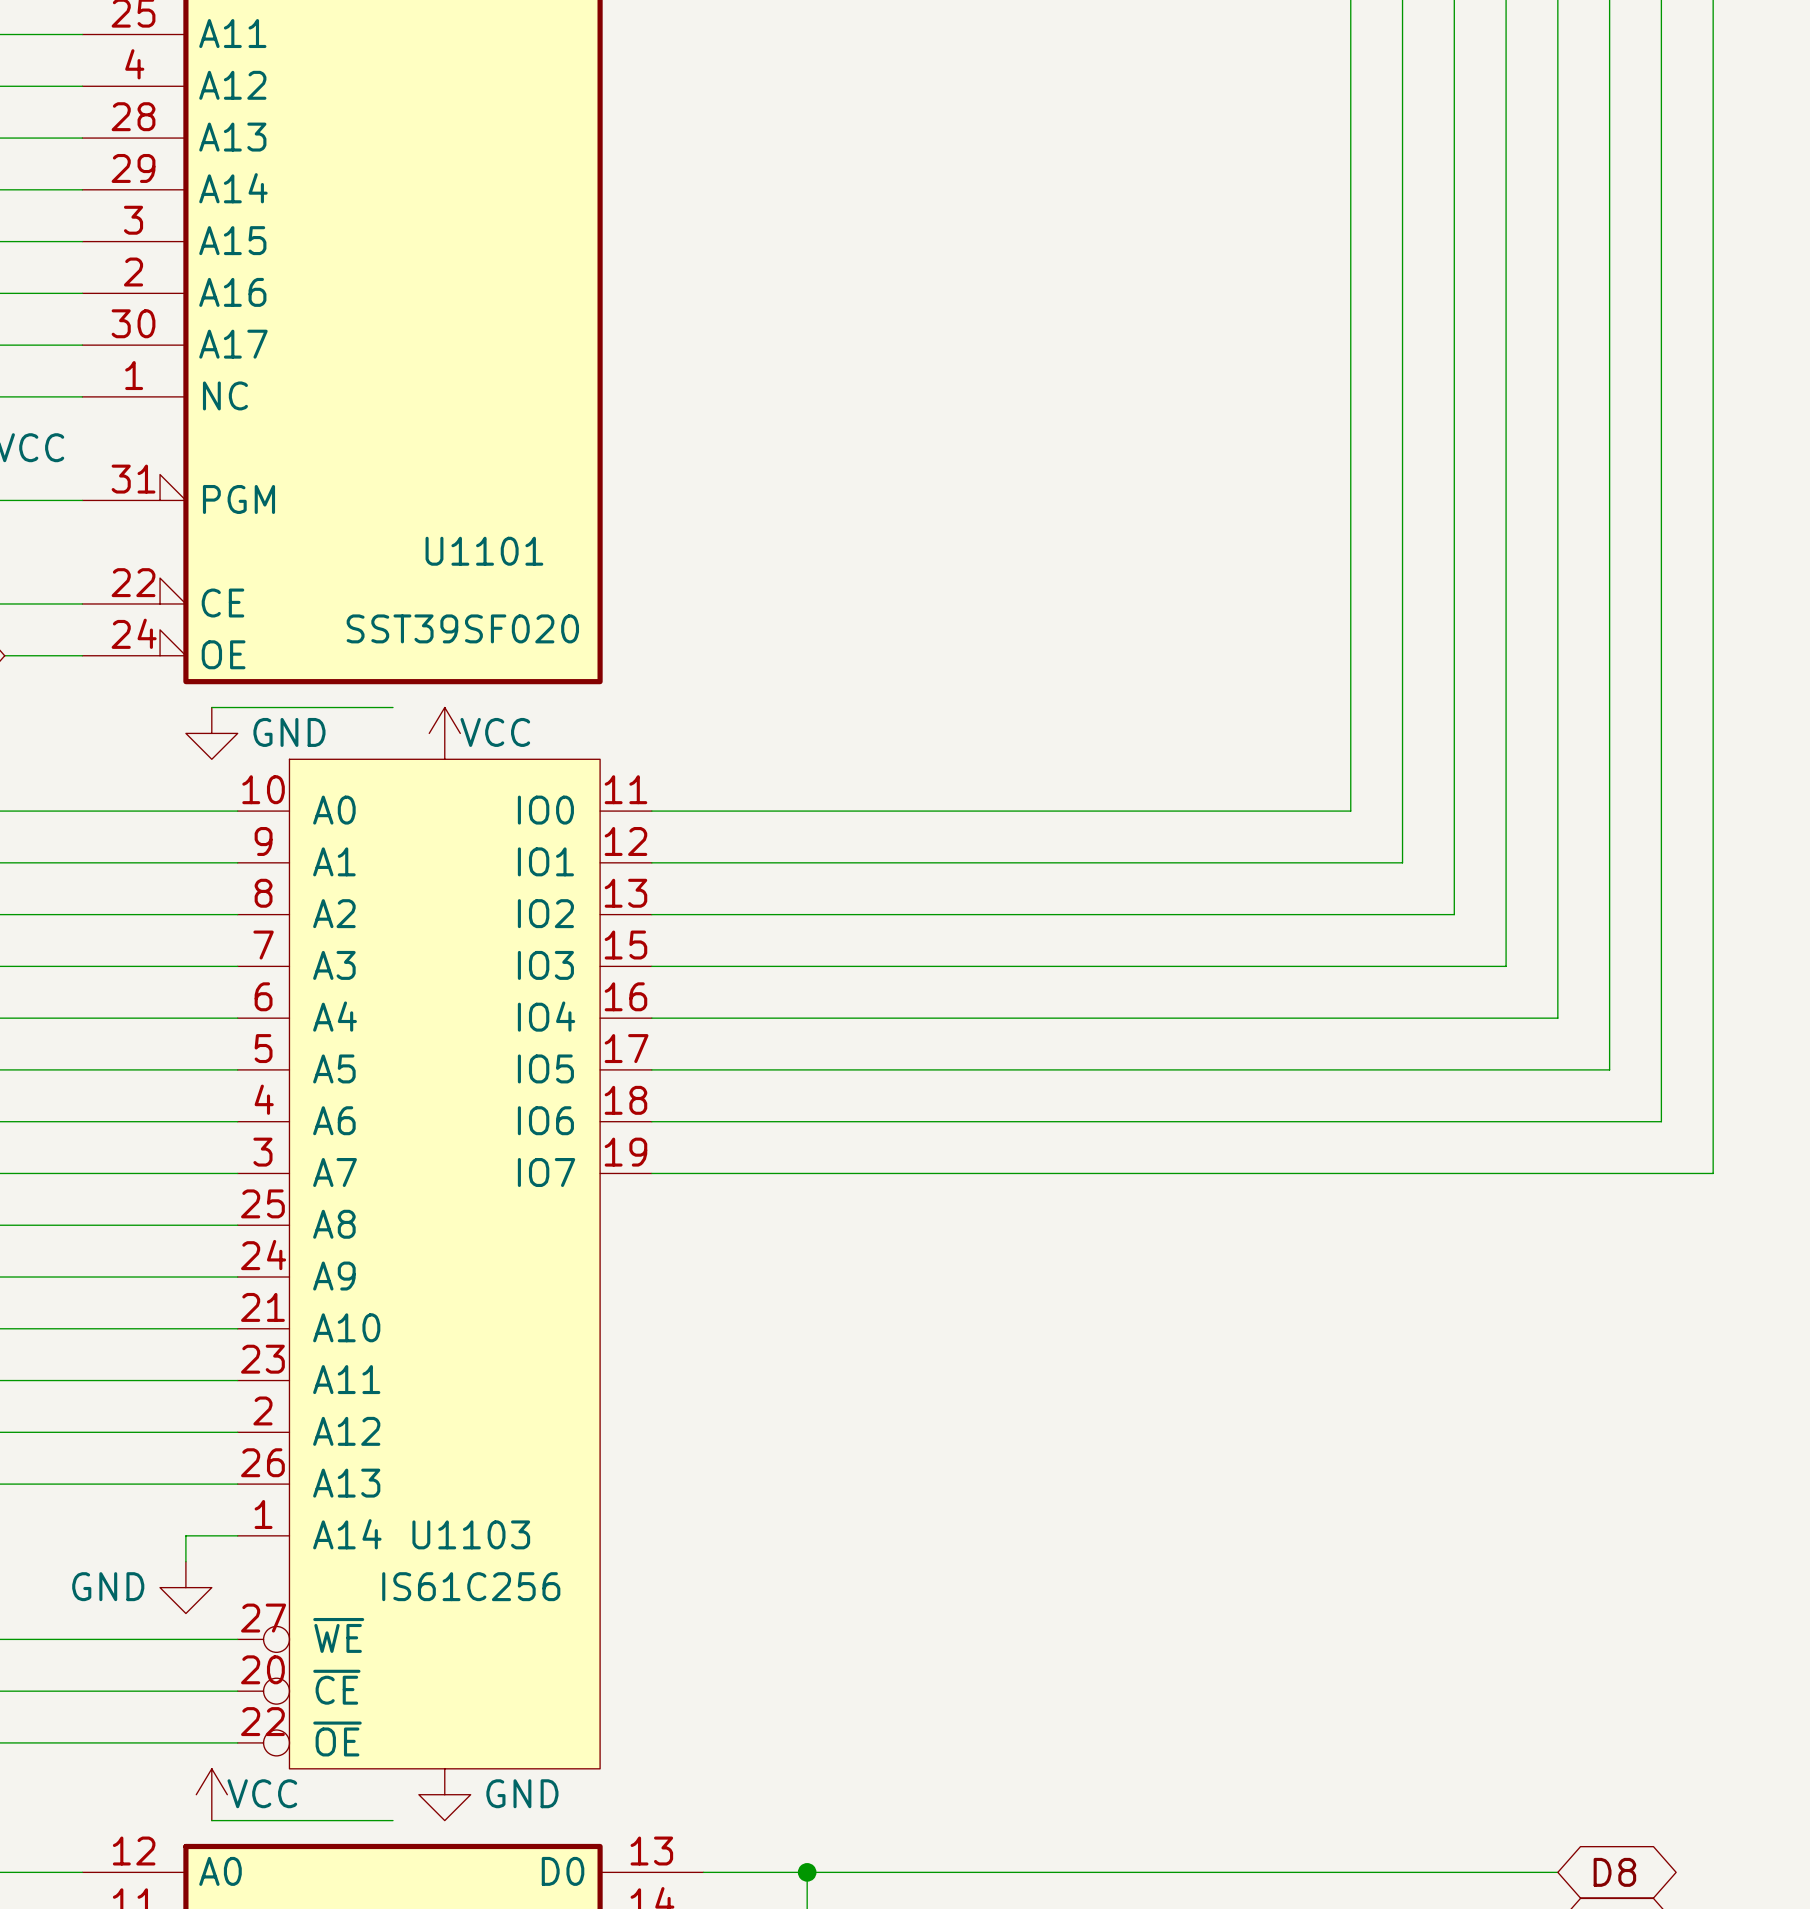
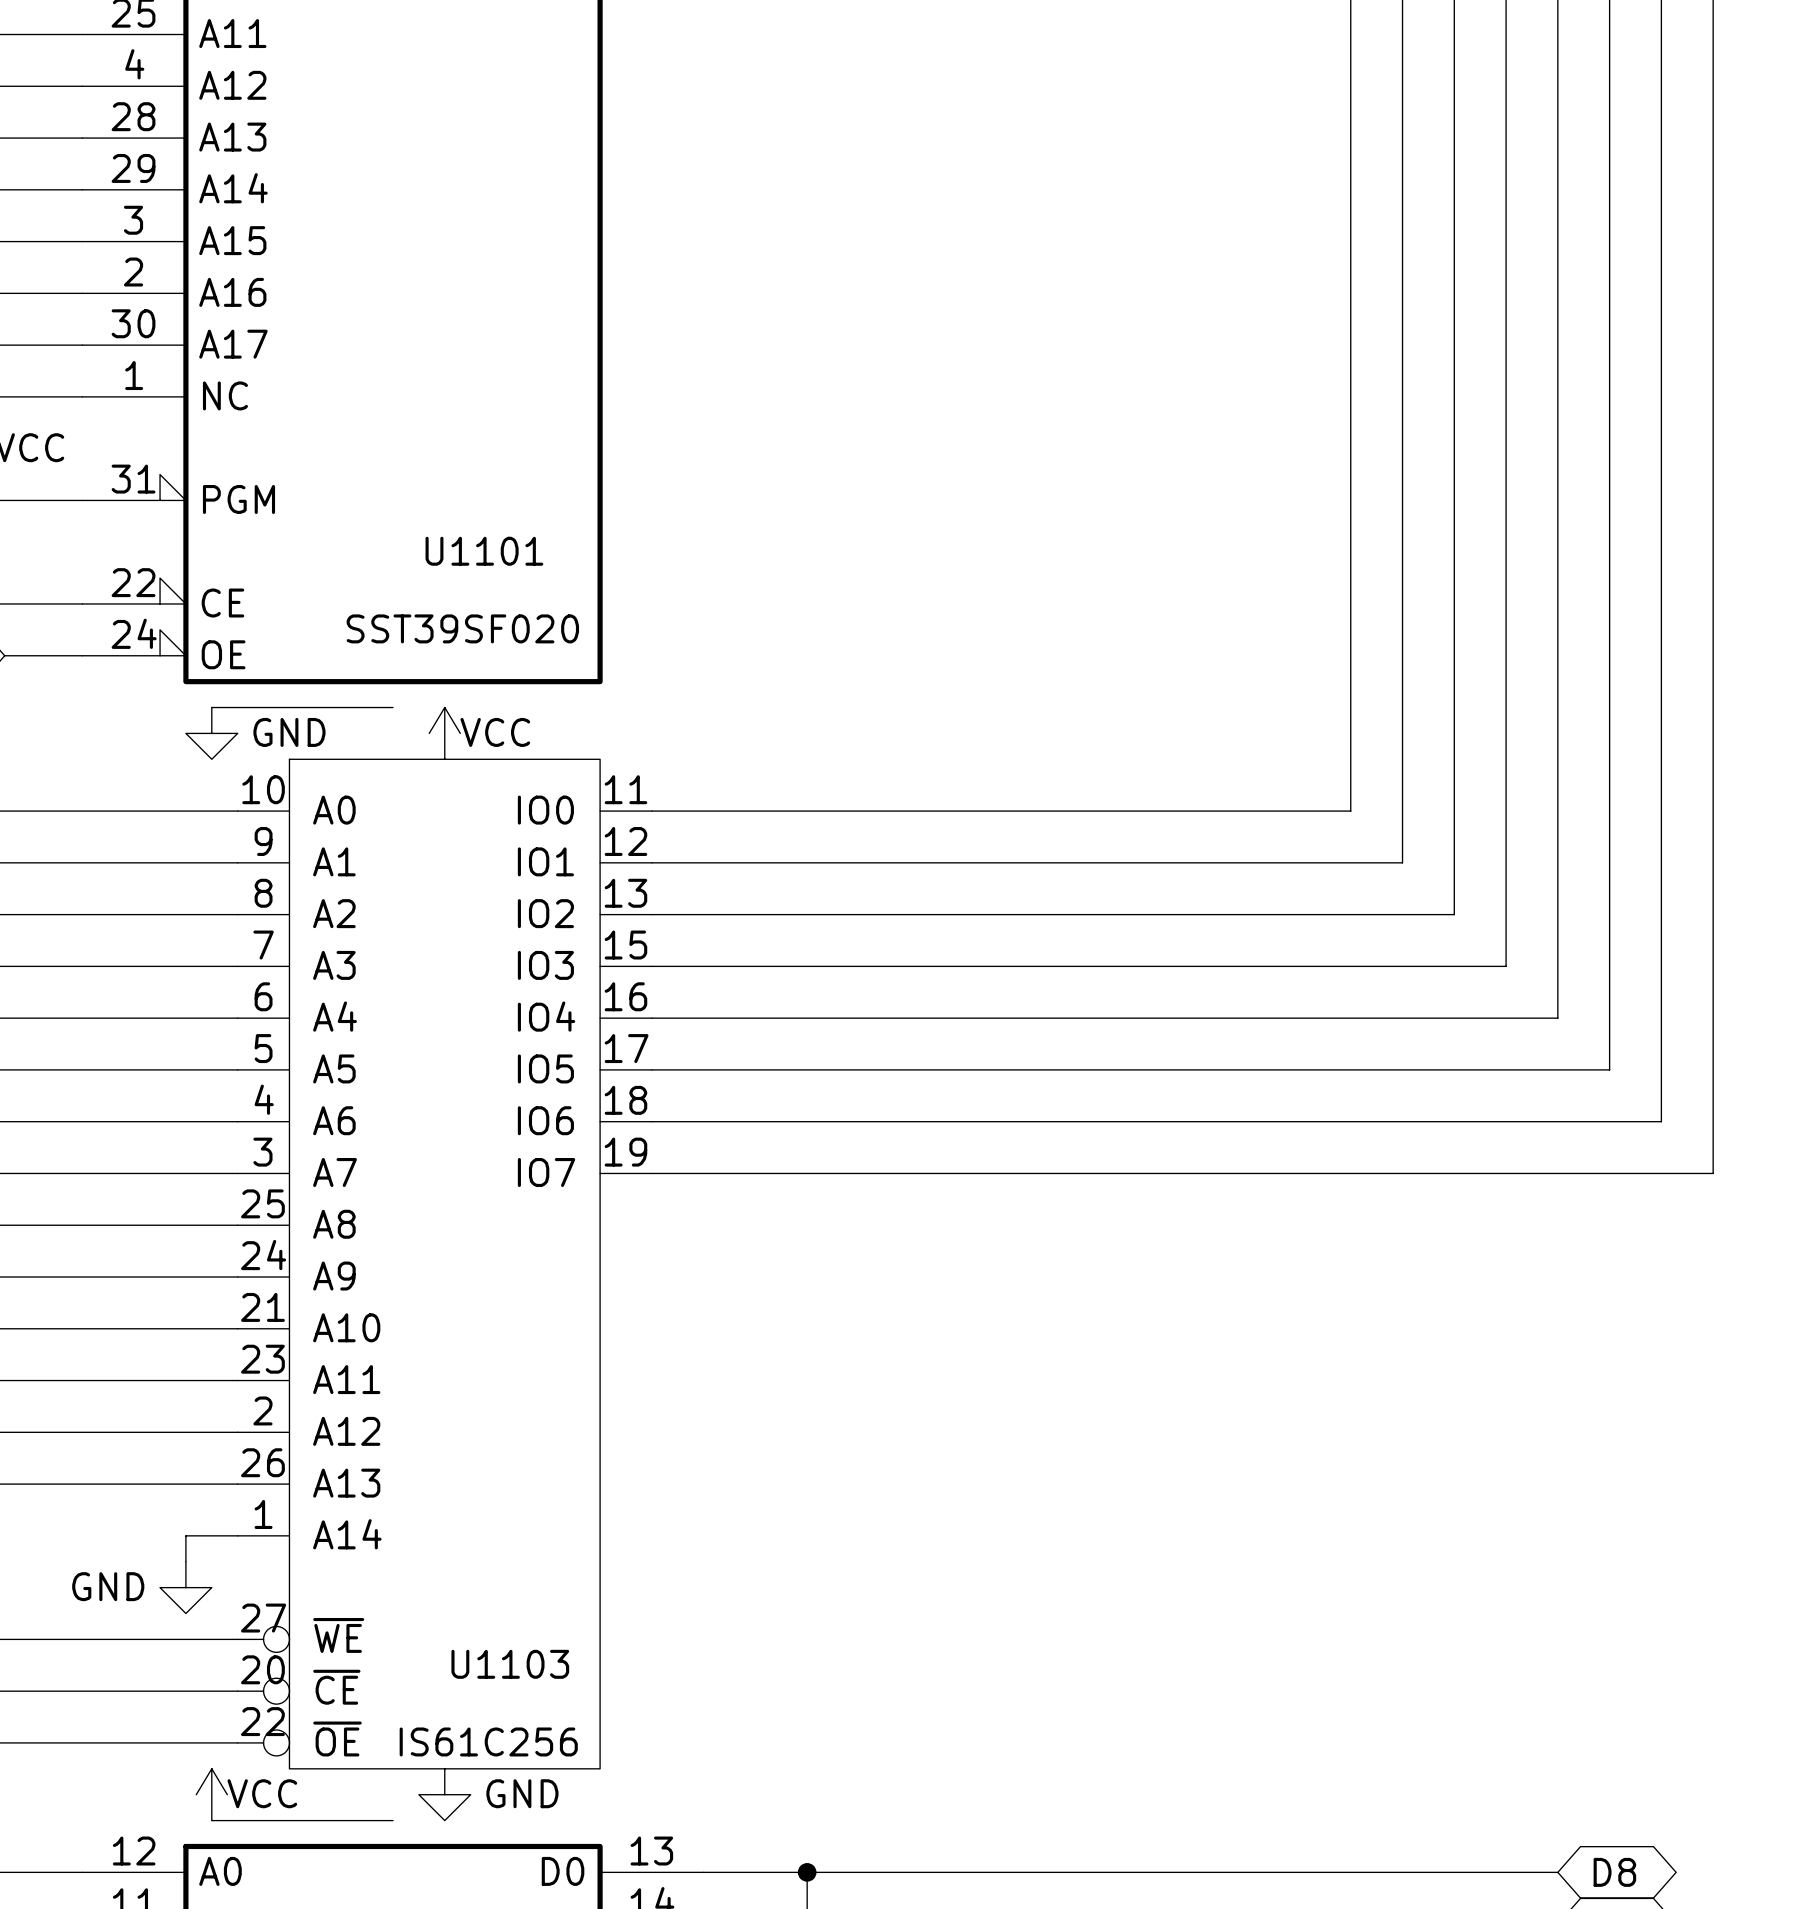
U1103 name position: U1103 (471, 1534) -> U1103 (510, 1664)
U1103 value position: IS61C256 (471, 1586) -> IS61C256 (488, 1741)

